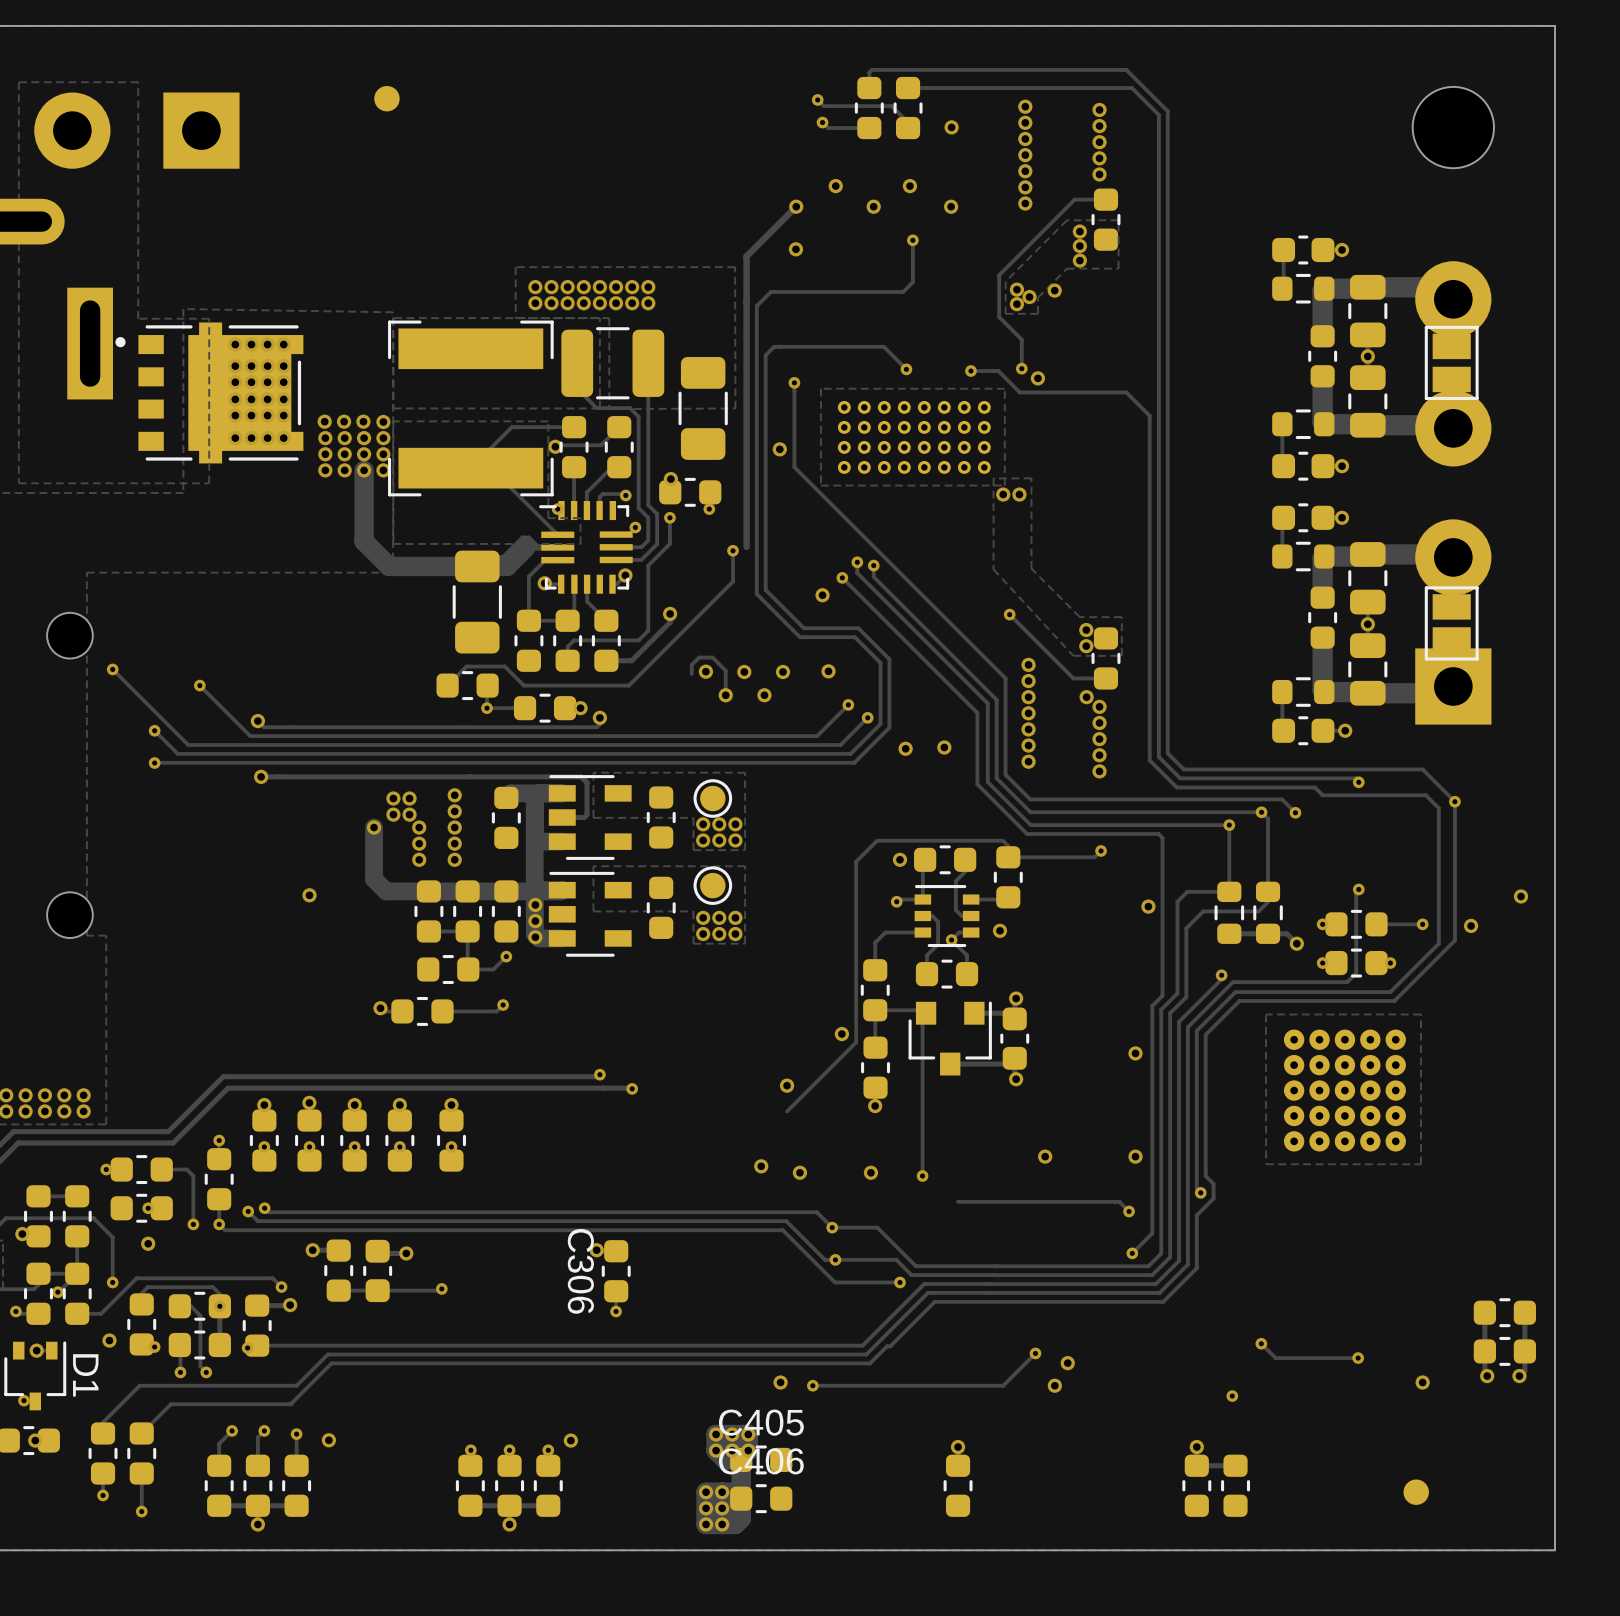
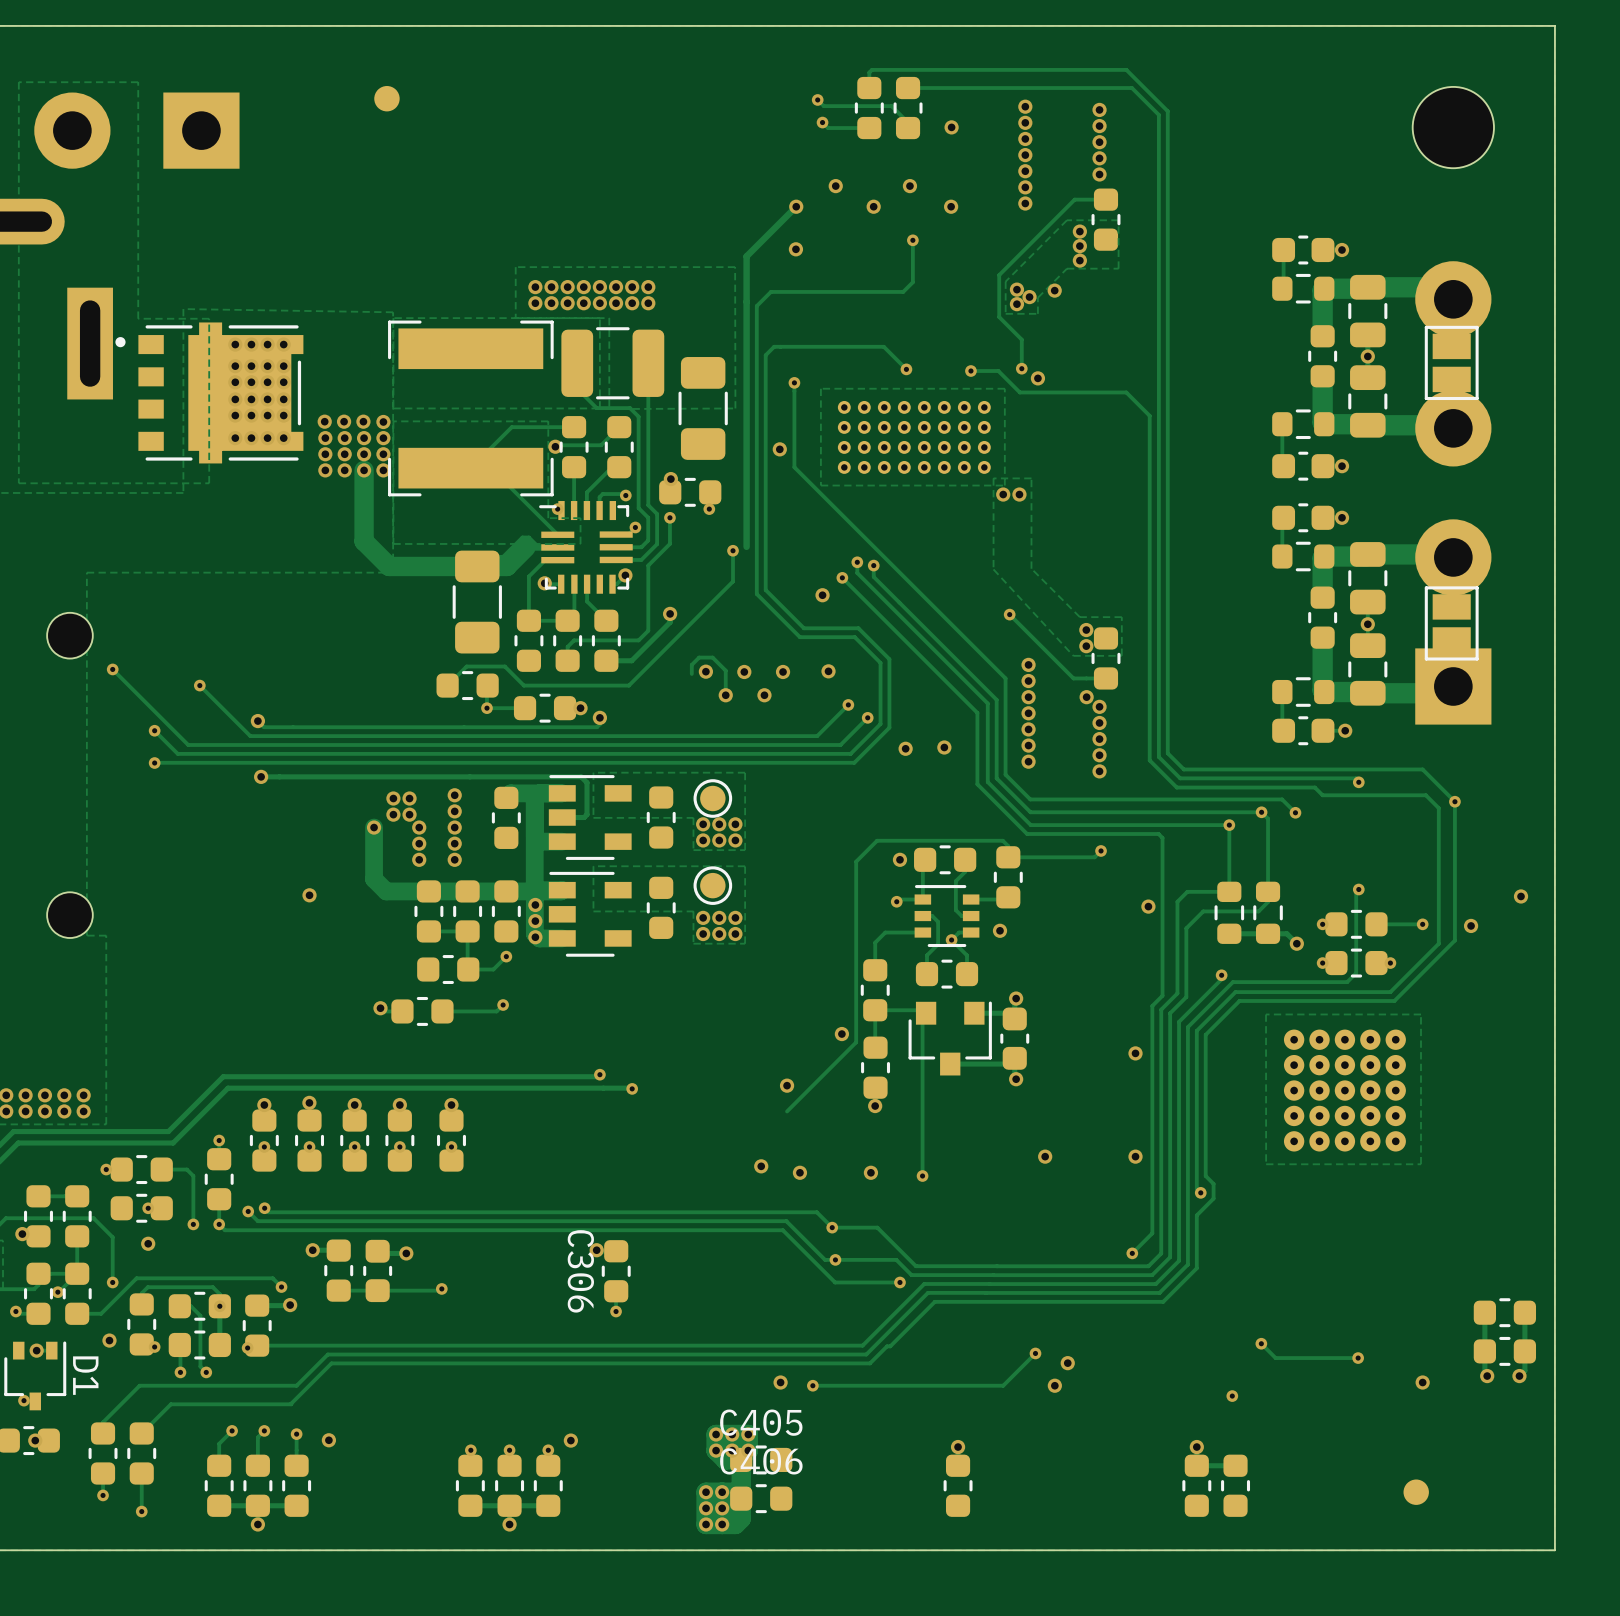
track: (958, 1201) (1119, 1201) (1129, 1211) -> none
via: (1129, 1211) -> none

